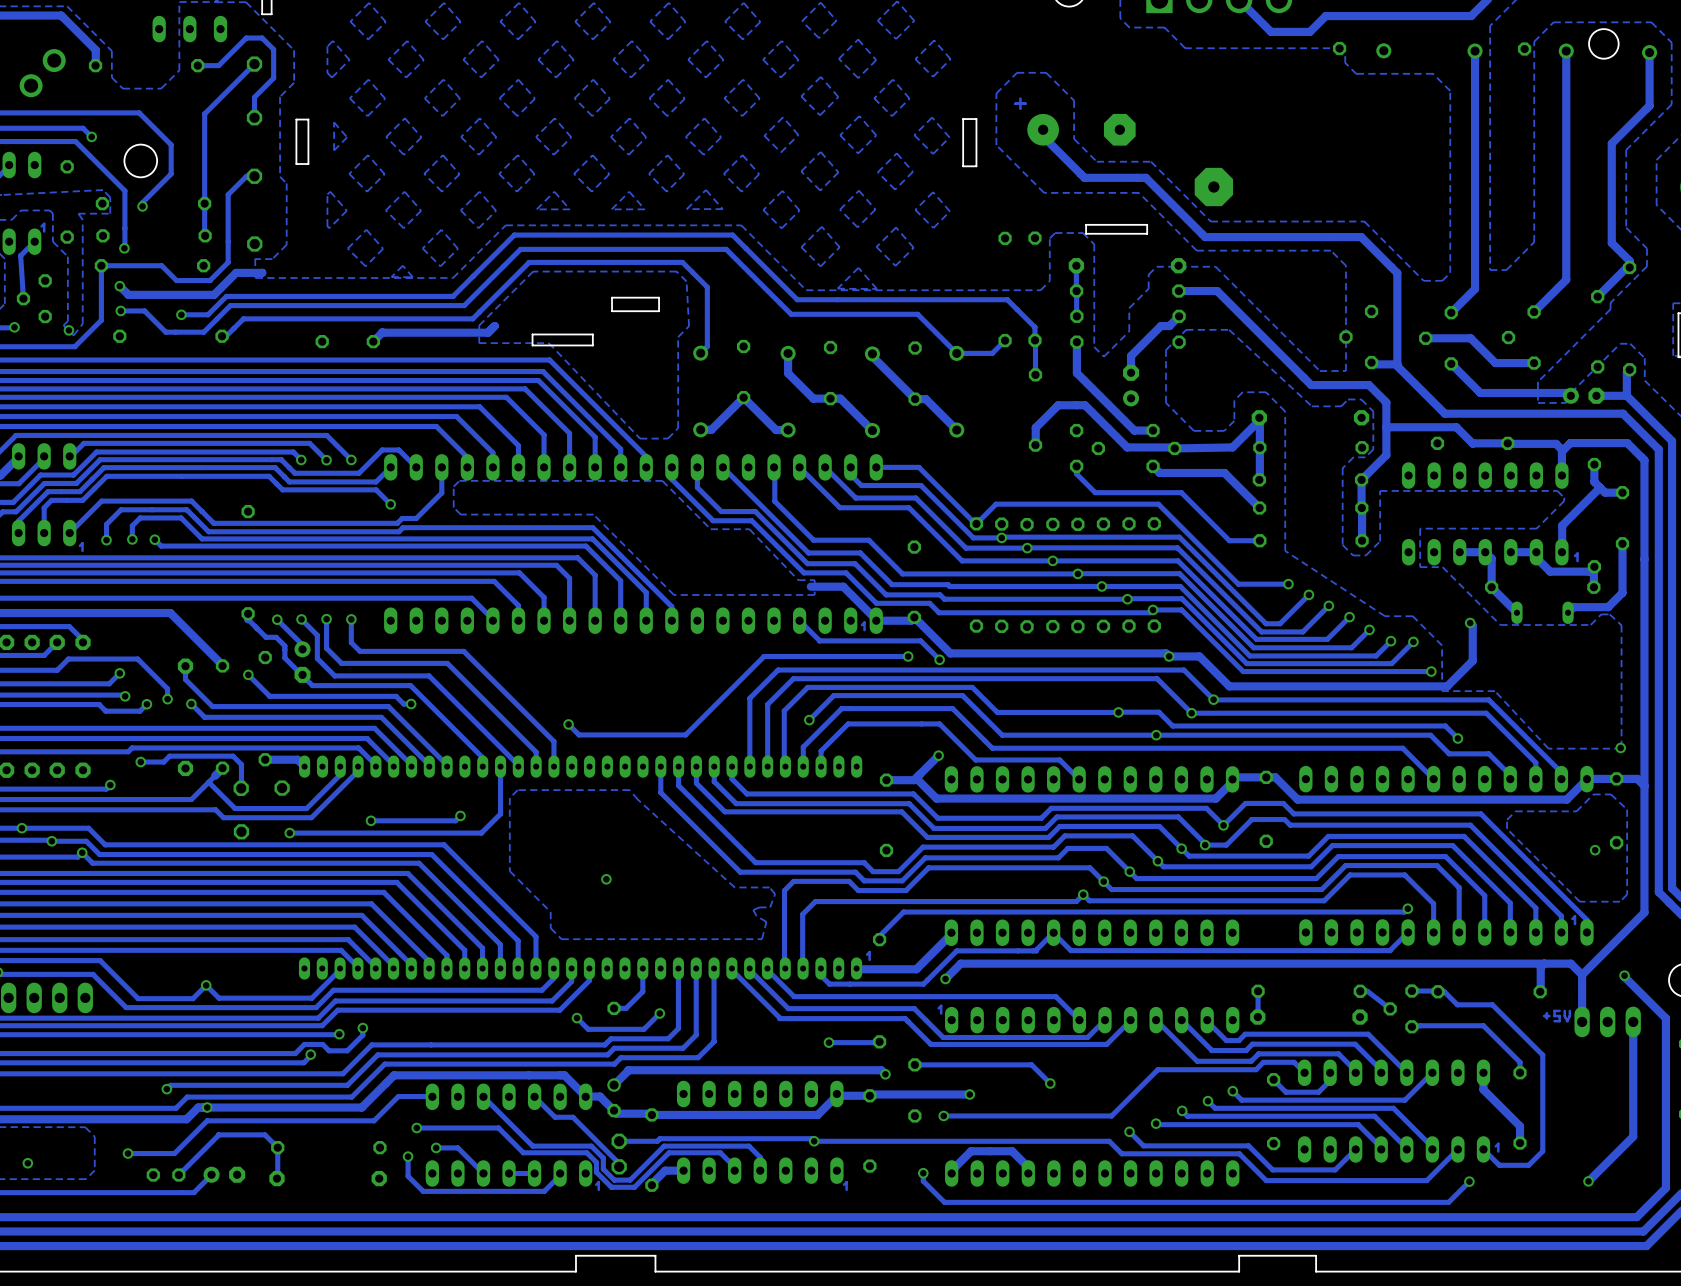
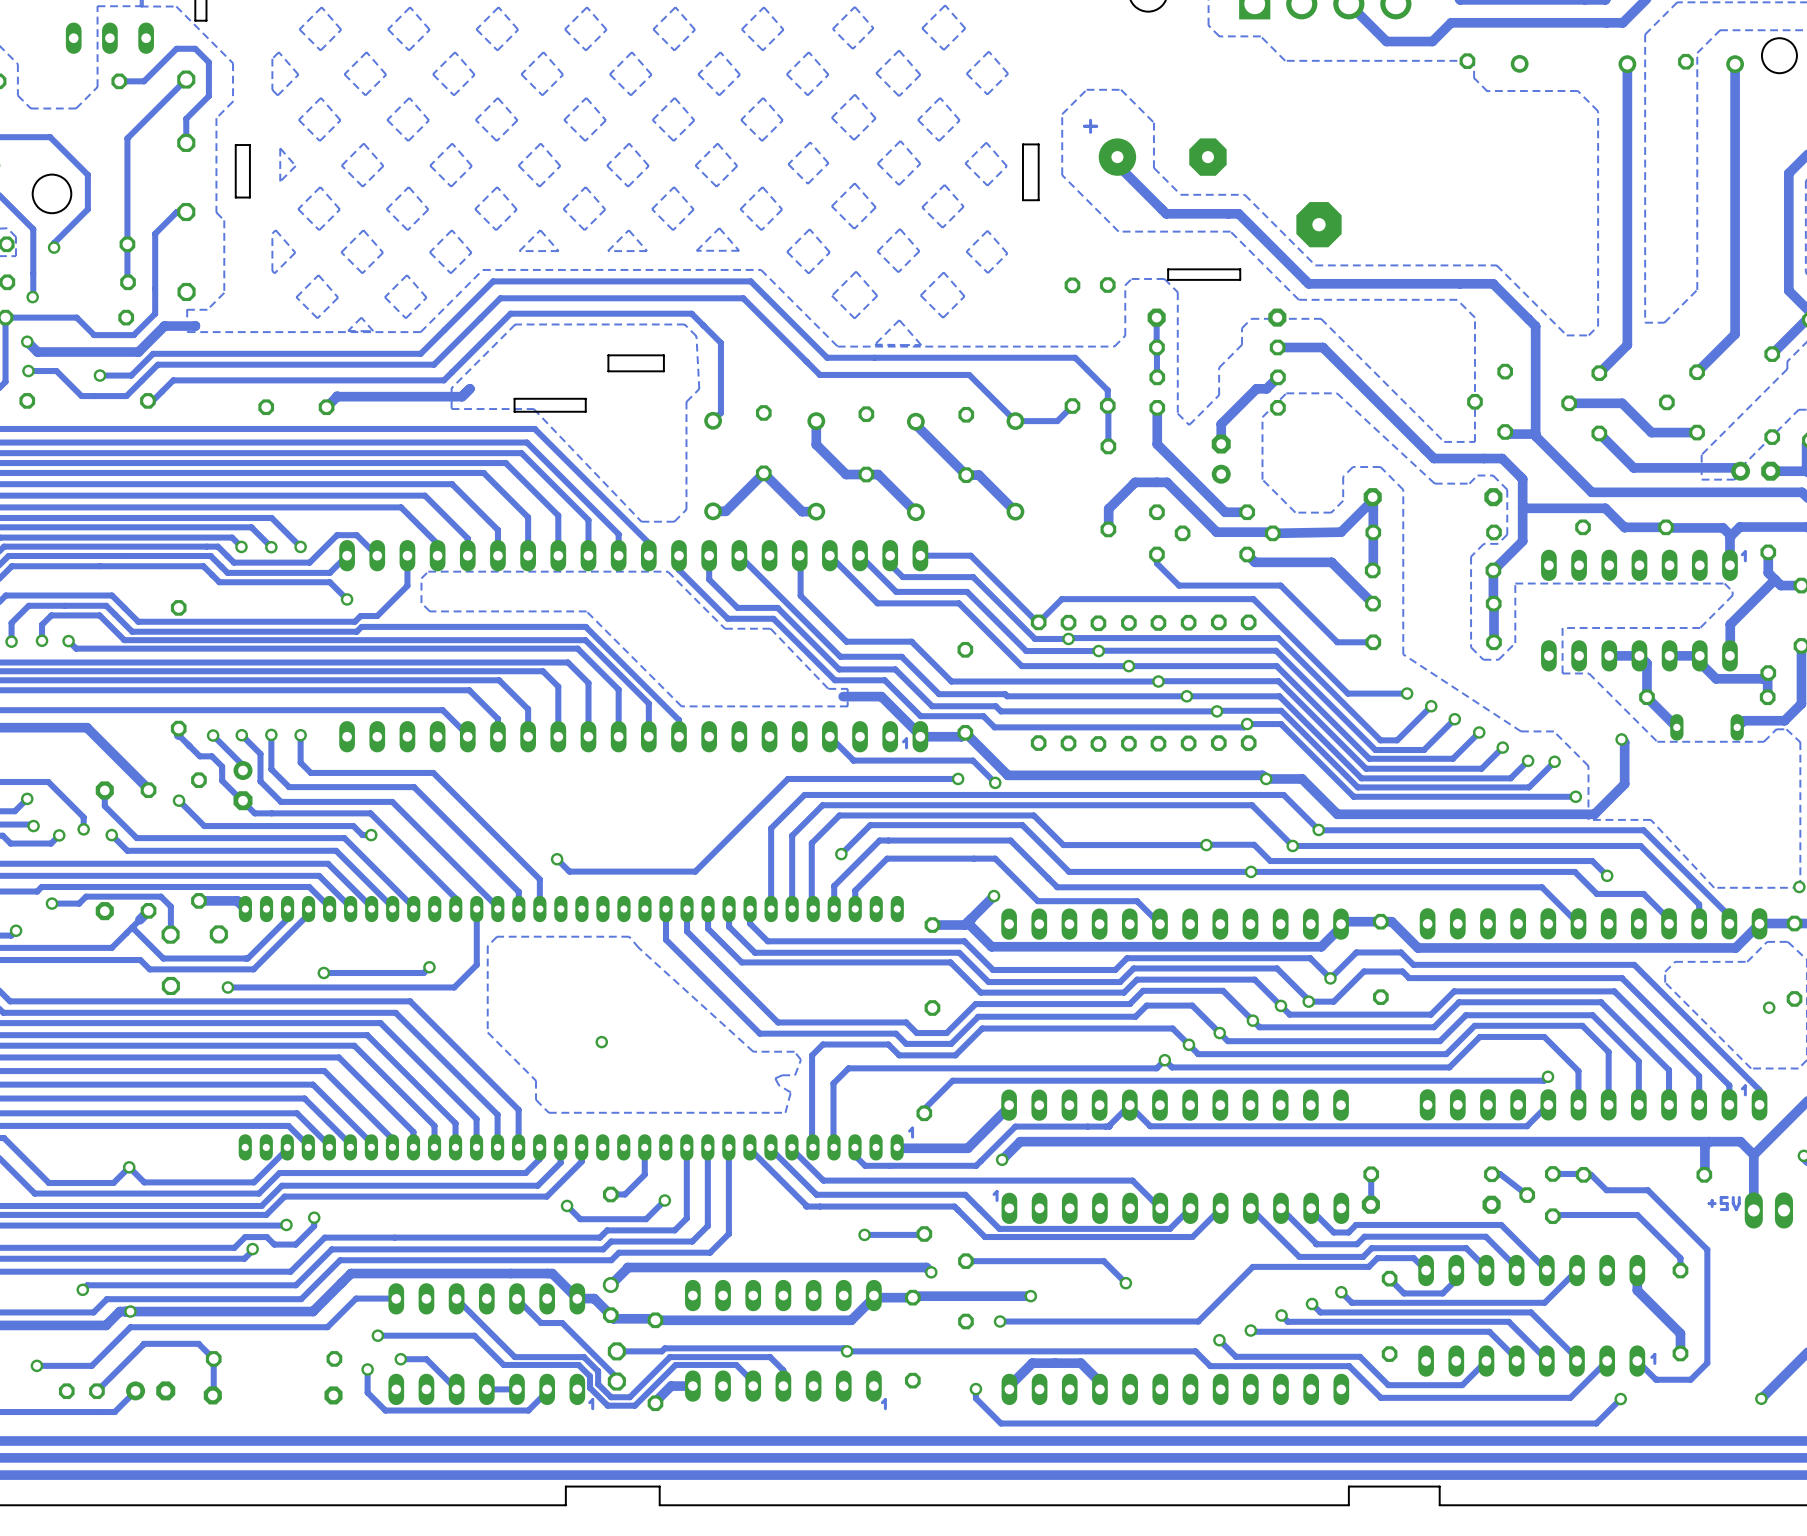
track: (1574, 556) (1577, 553) (1577, 561) -> (1742, 554) (1745, 551) (1745, 560)

